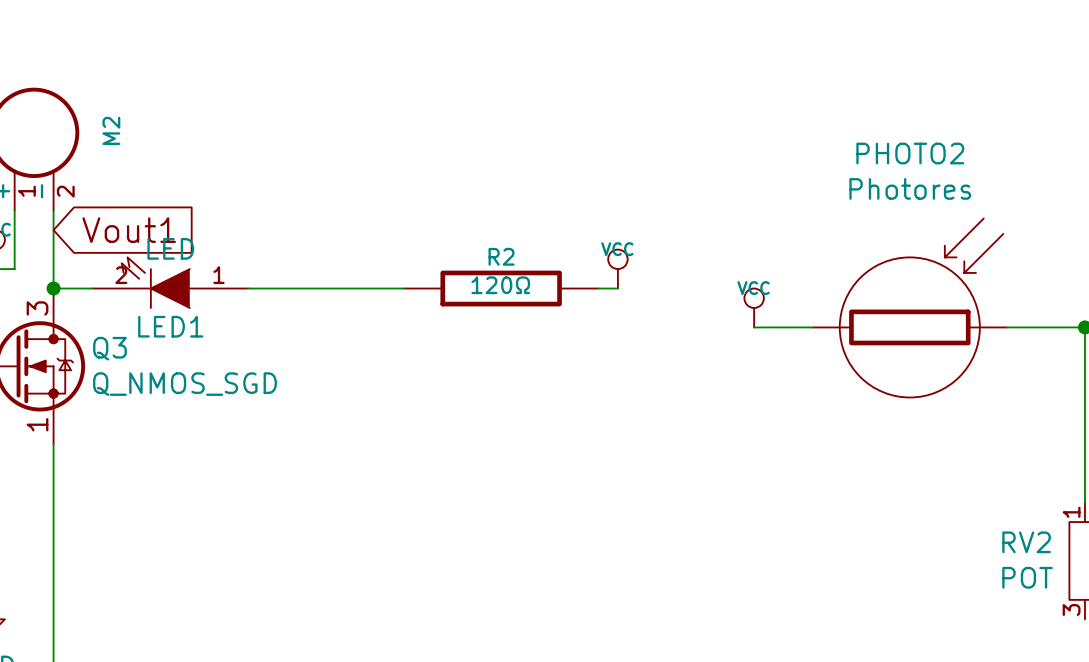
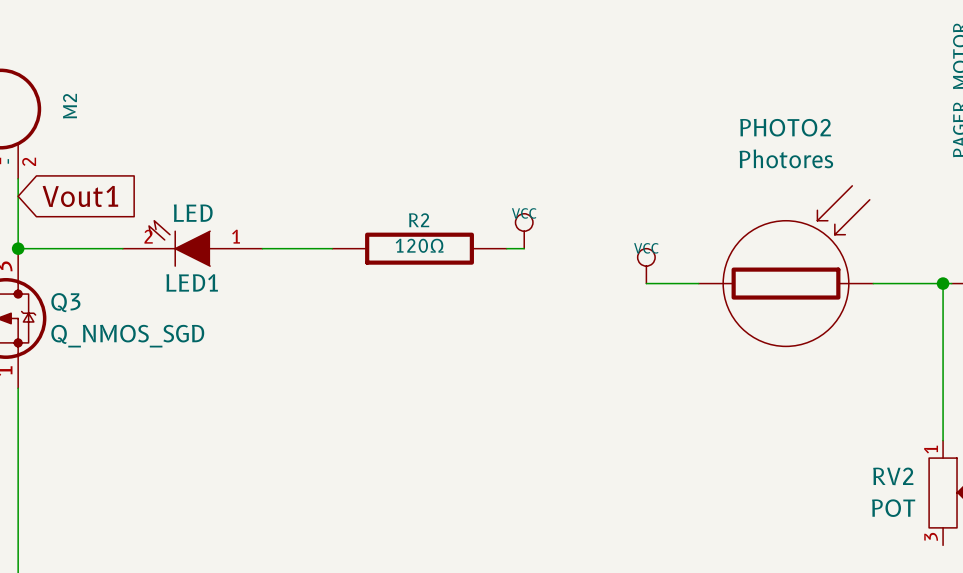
LED1 position: (170, 282) -> (192, 243)

